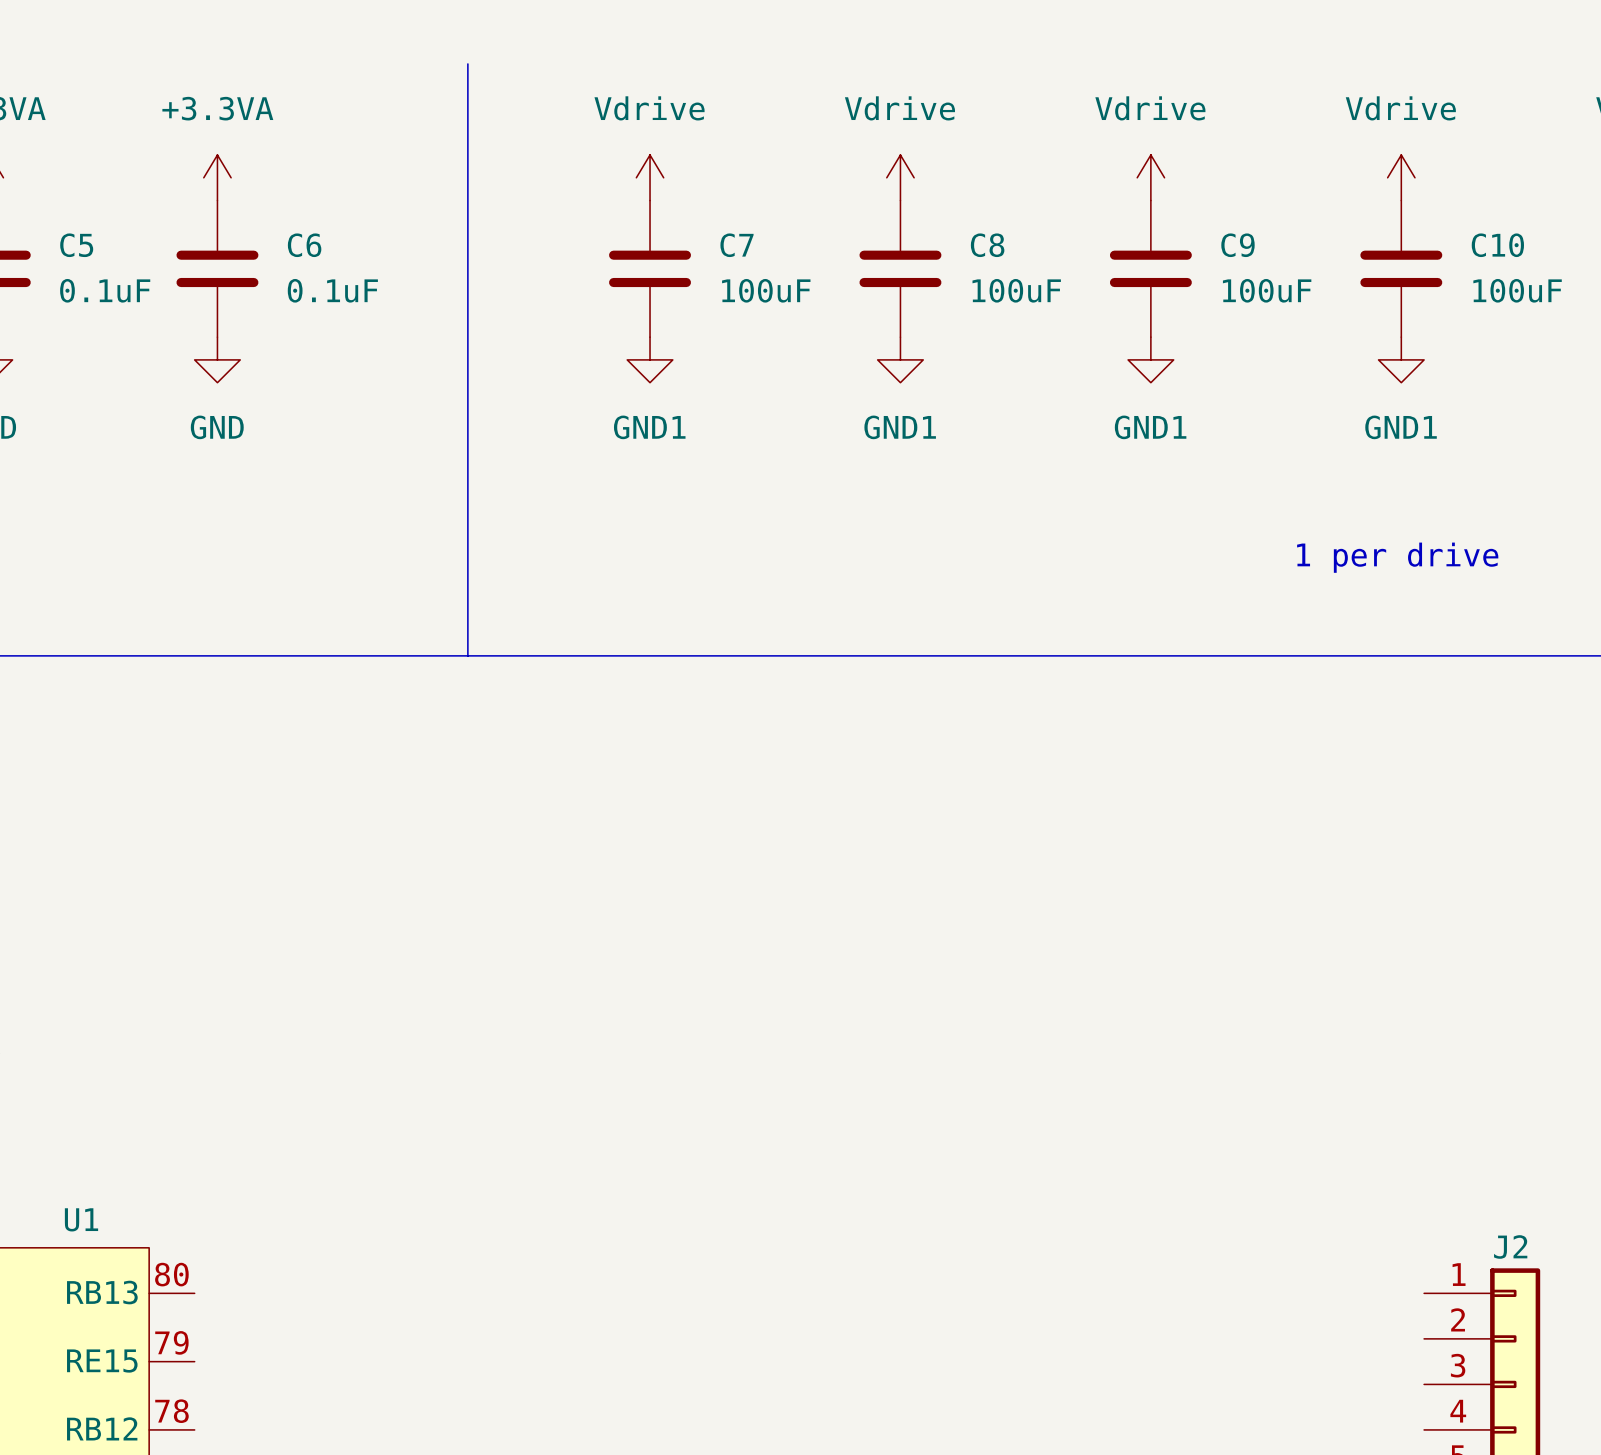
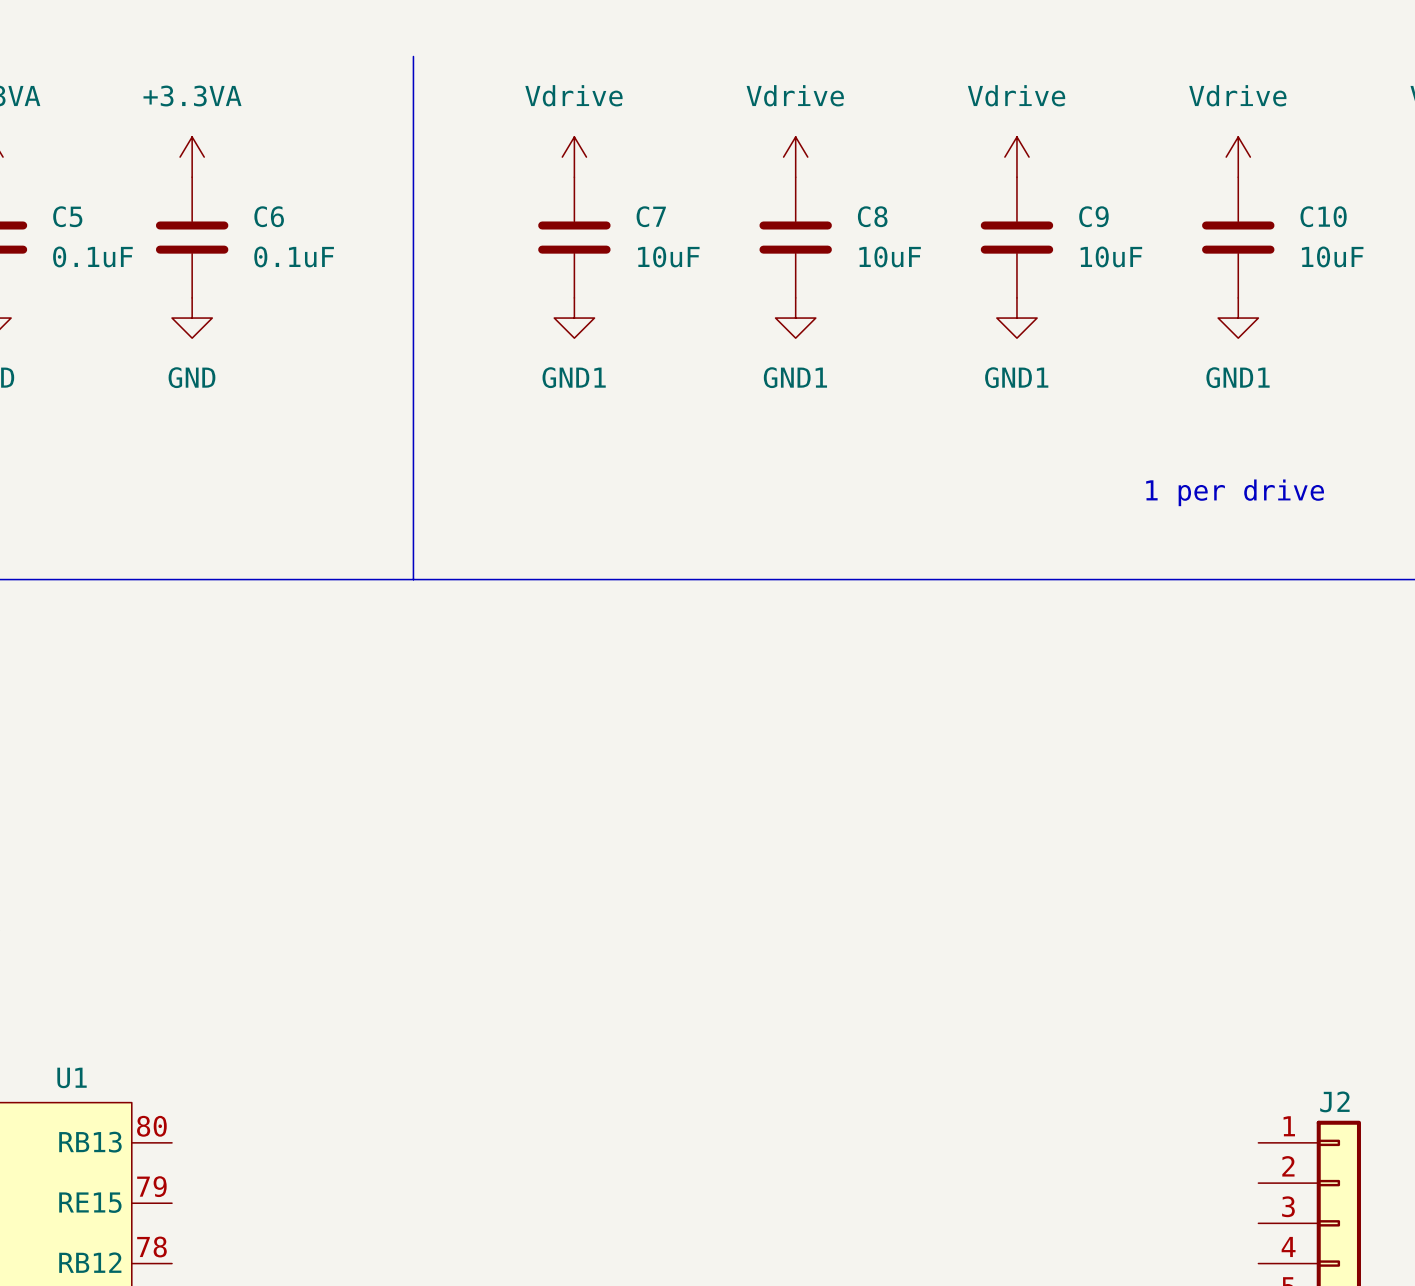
C7 value: 100uF (766, 290) -> 10uF (668, 256)
C8 value: 100uF (1016, 290) -> 10uF (890, 256)
C9 value: 100uF (1267, 290) -> 10uF (1111, 256)
C10 value: 100uF (1517, 290) -> 10uF (1332, 256)

